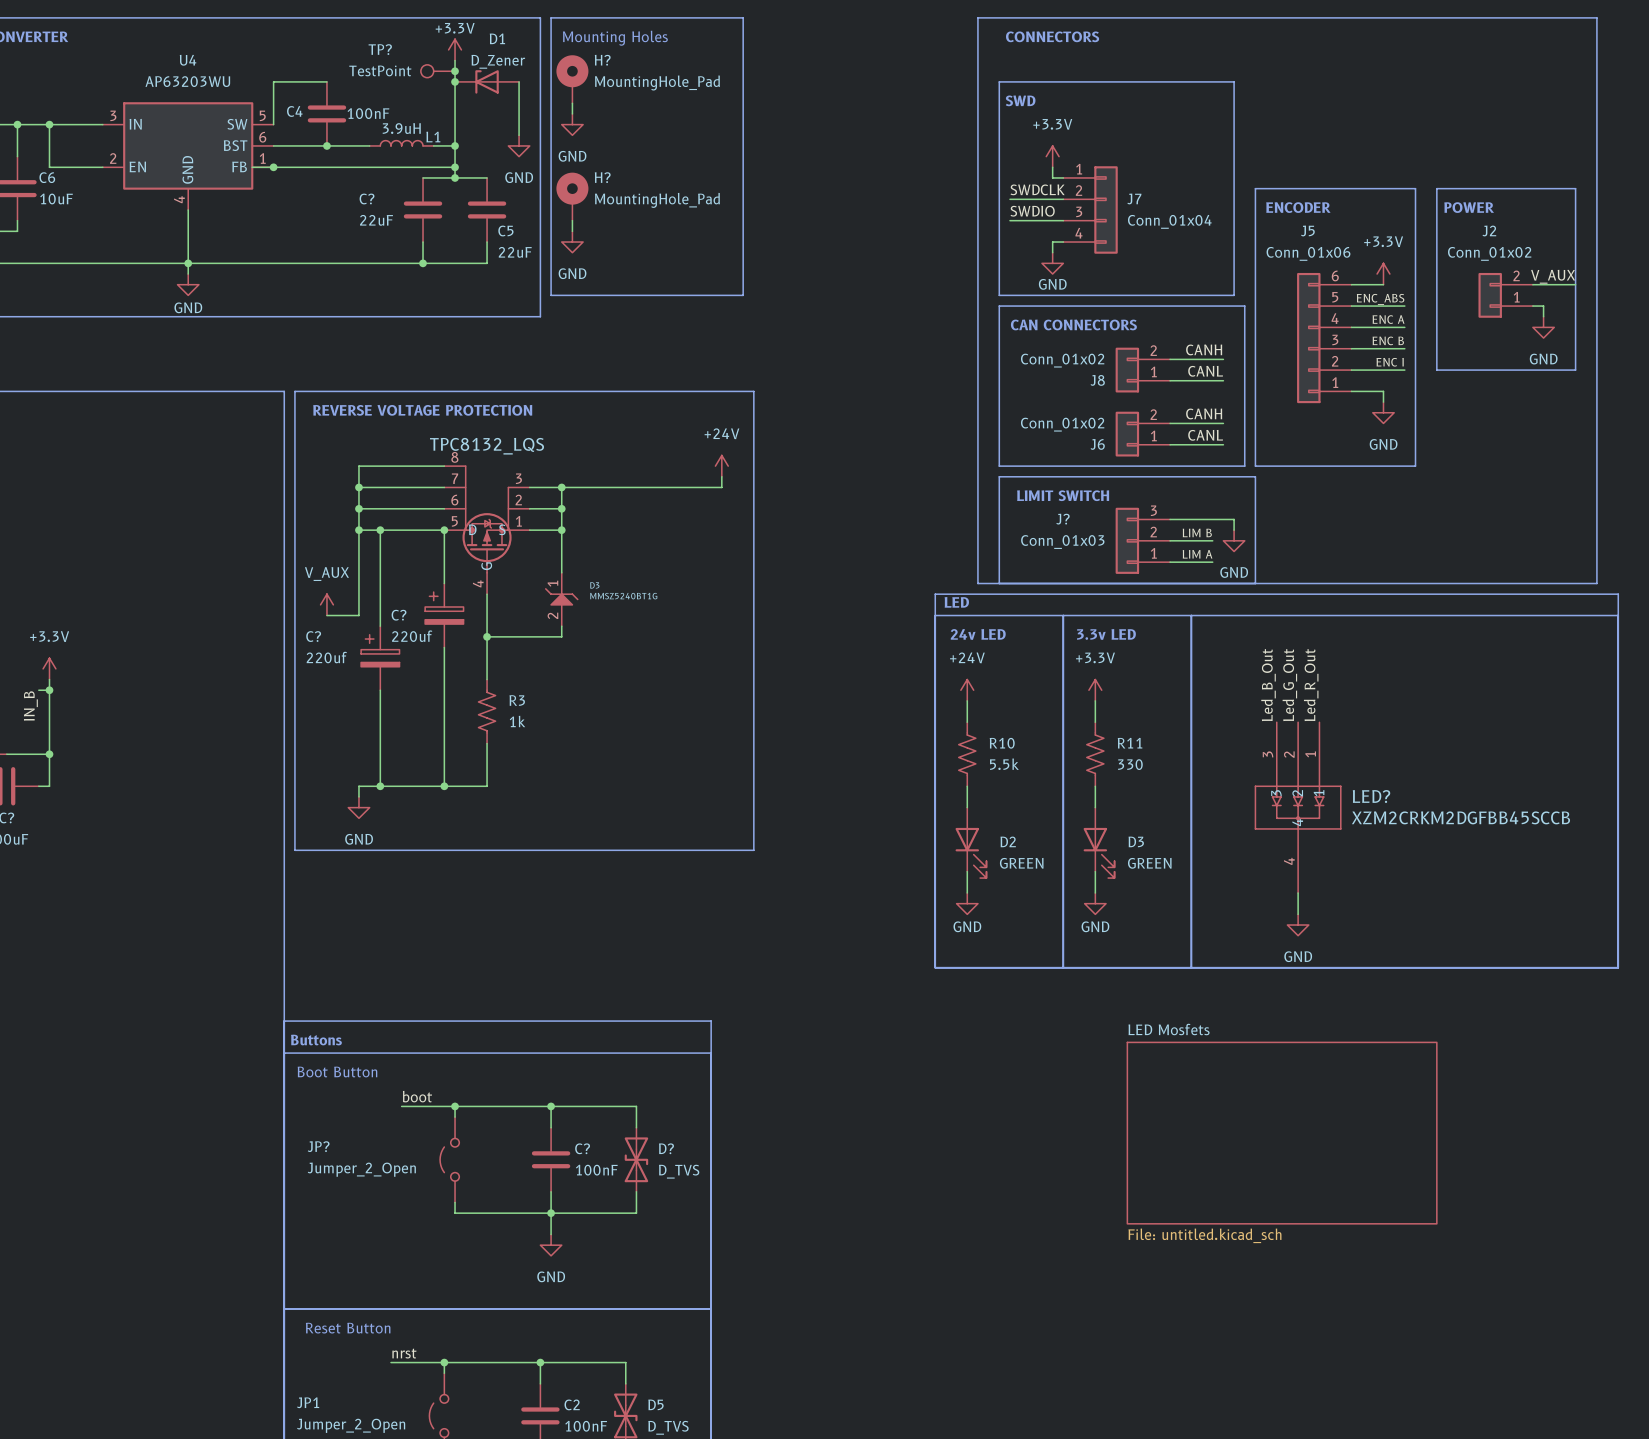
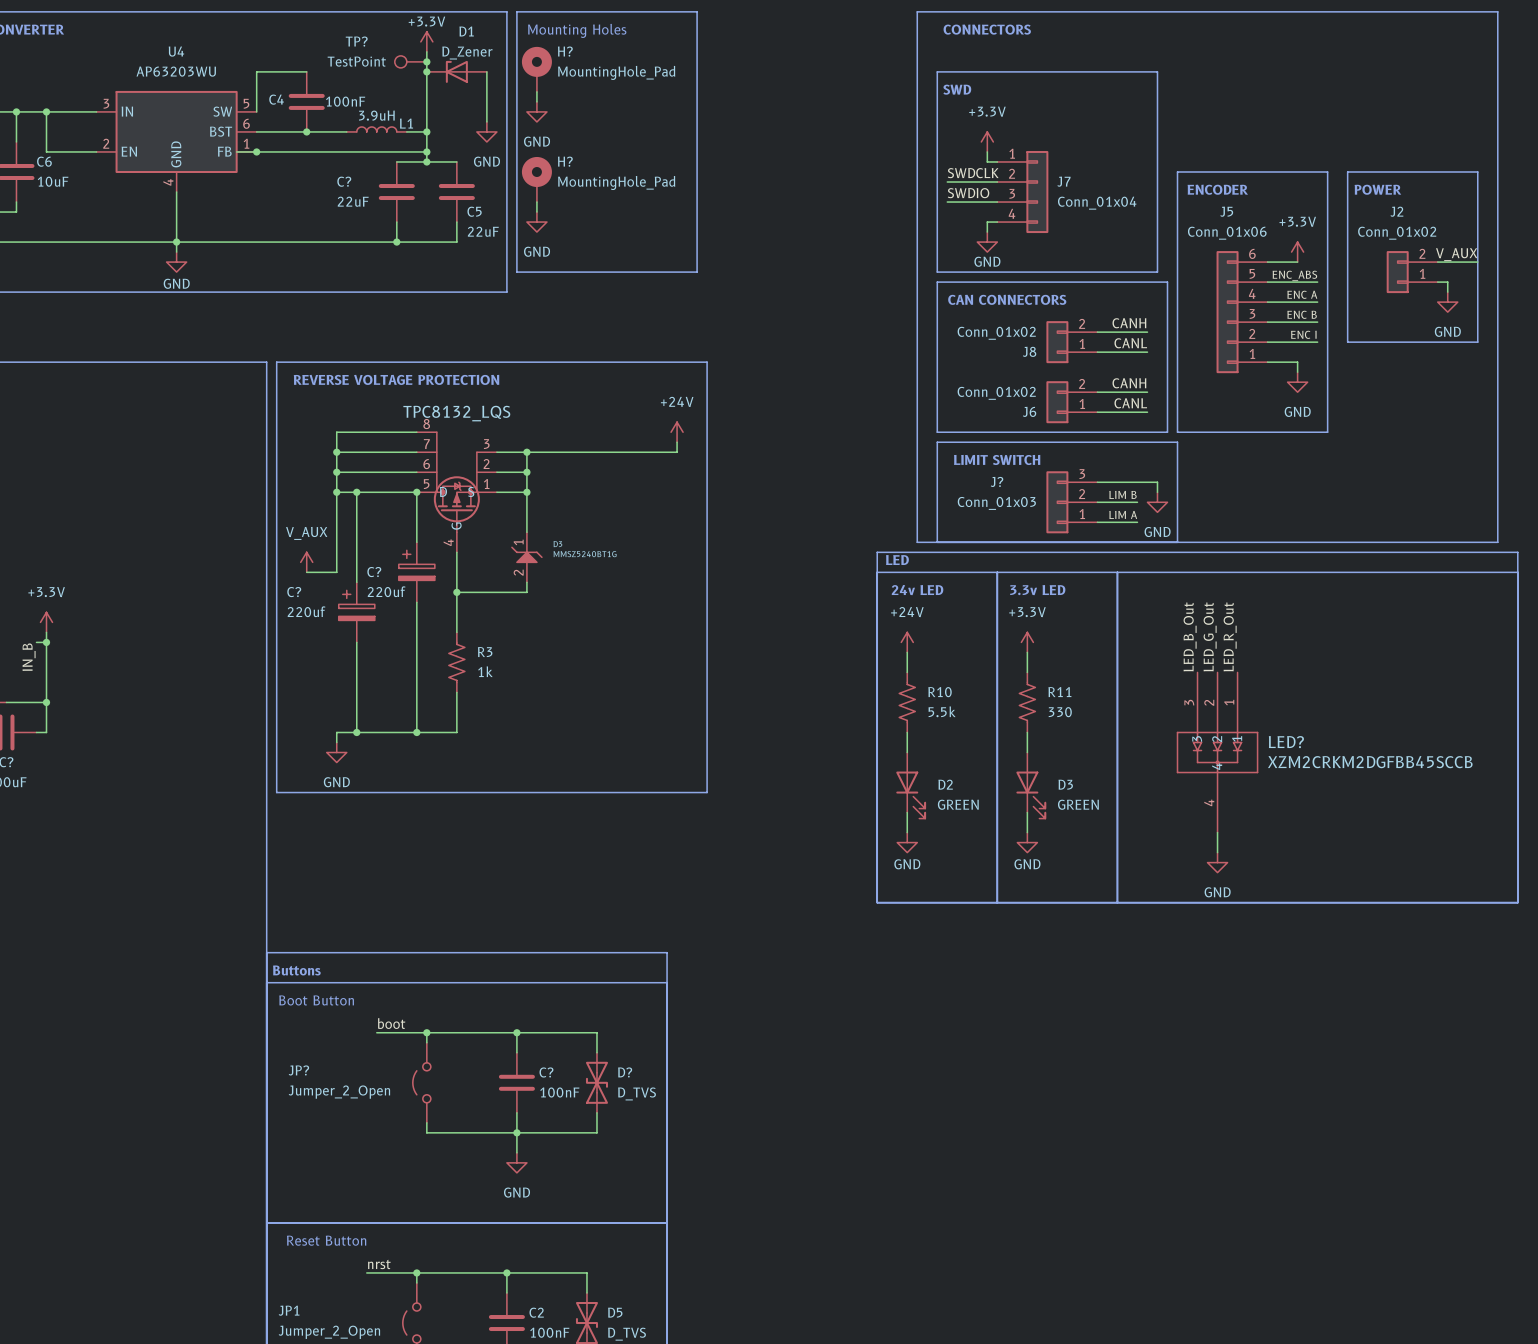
label: Led_B_Out (1268, 685) -> LED_B_Out (1190, 636)
label: Led_G_Out (1289, 685) -> LED_G_Out (1210, 636)
label: Led_R_Out (1311, 685) -> LED_R_Out (1230, 636)
sheet LED Mosfets: File: untitled.kicad_sch (1282, 1133) -> none

